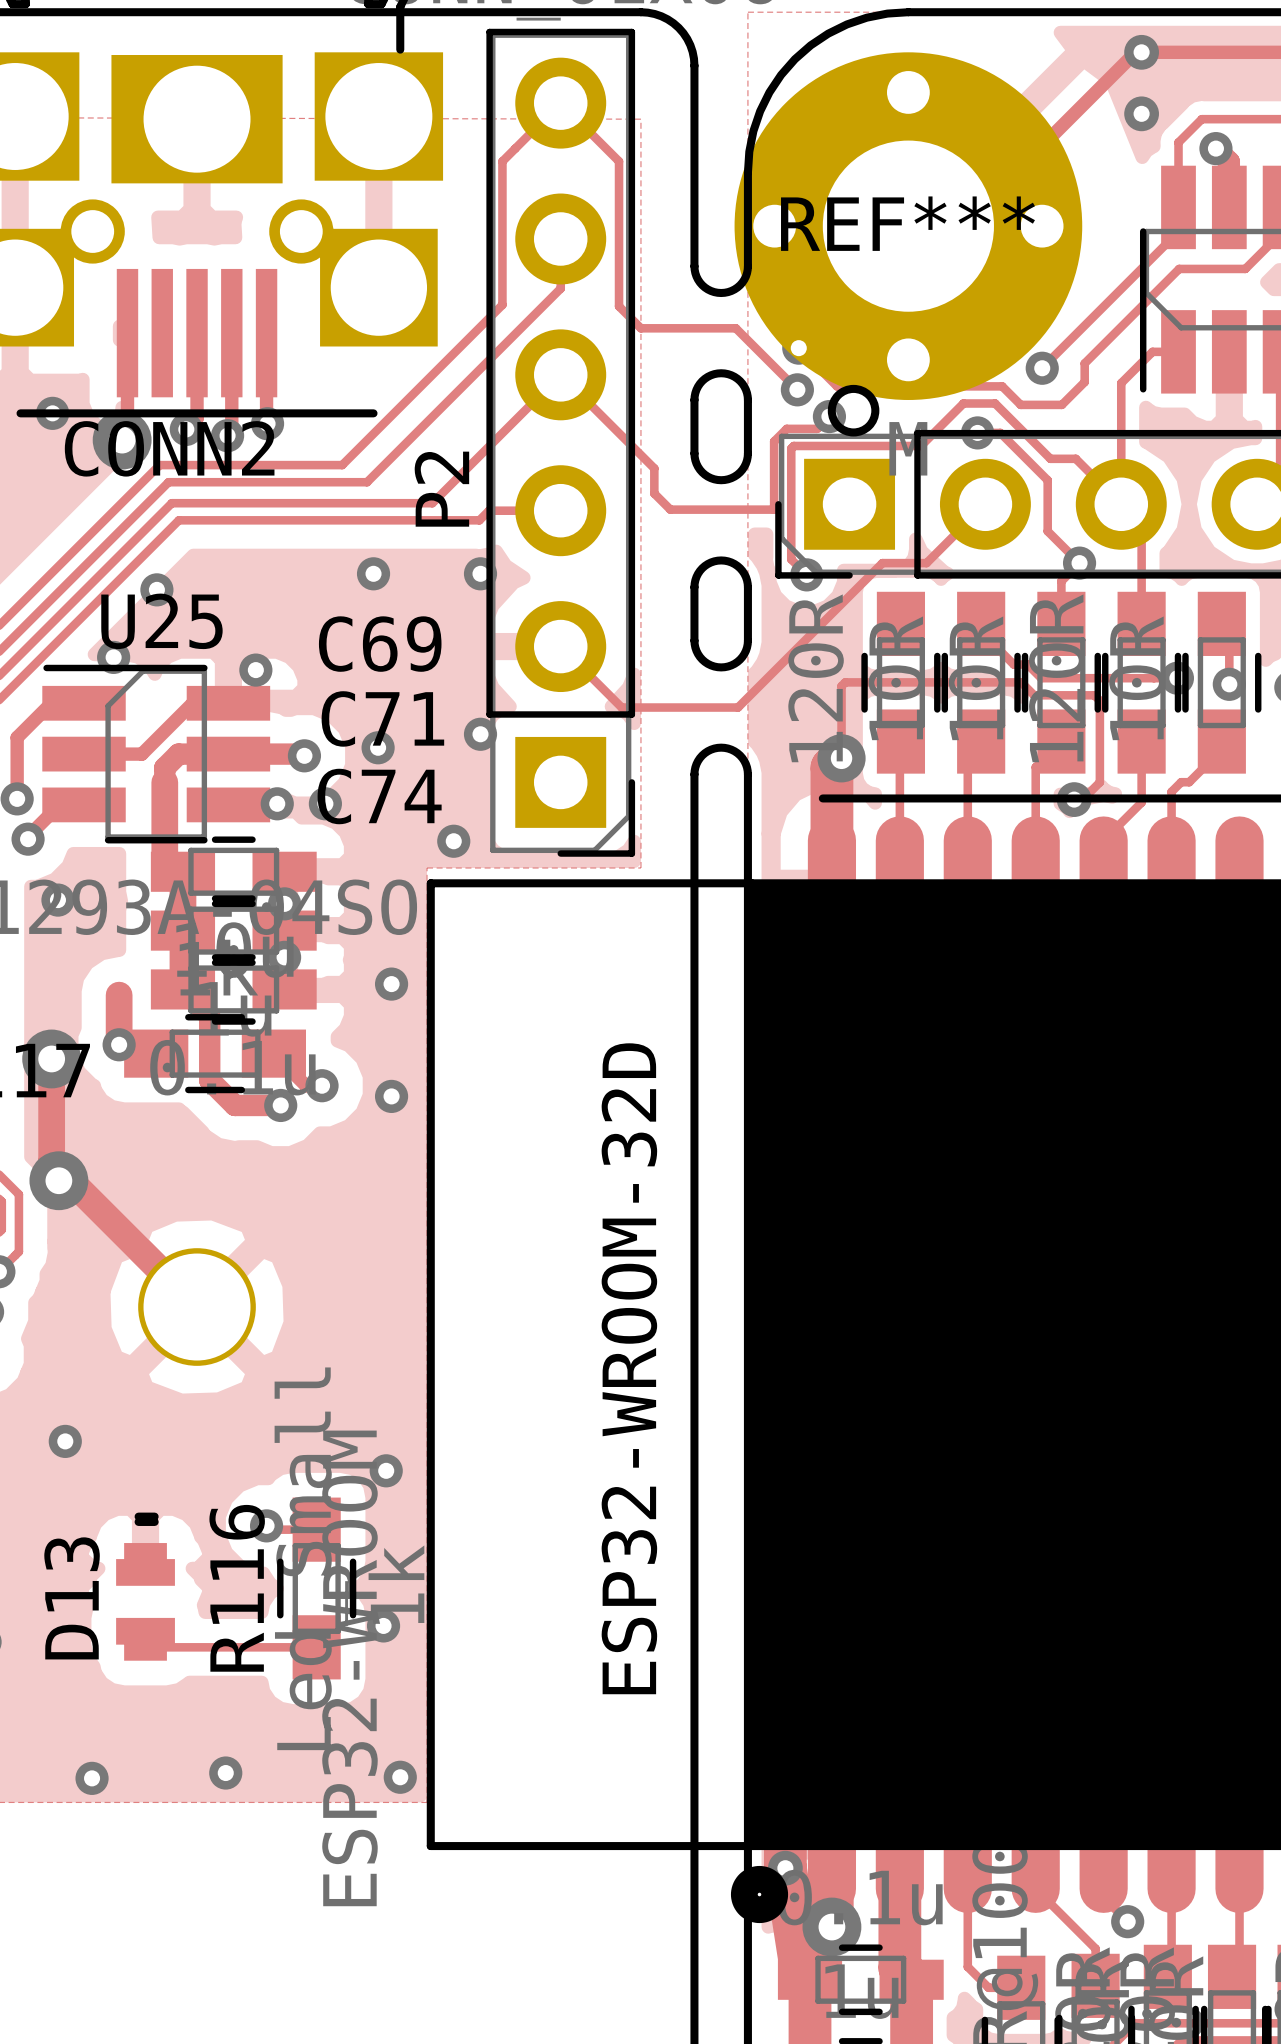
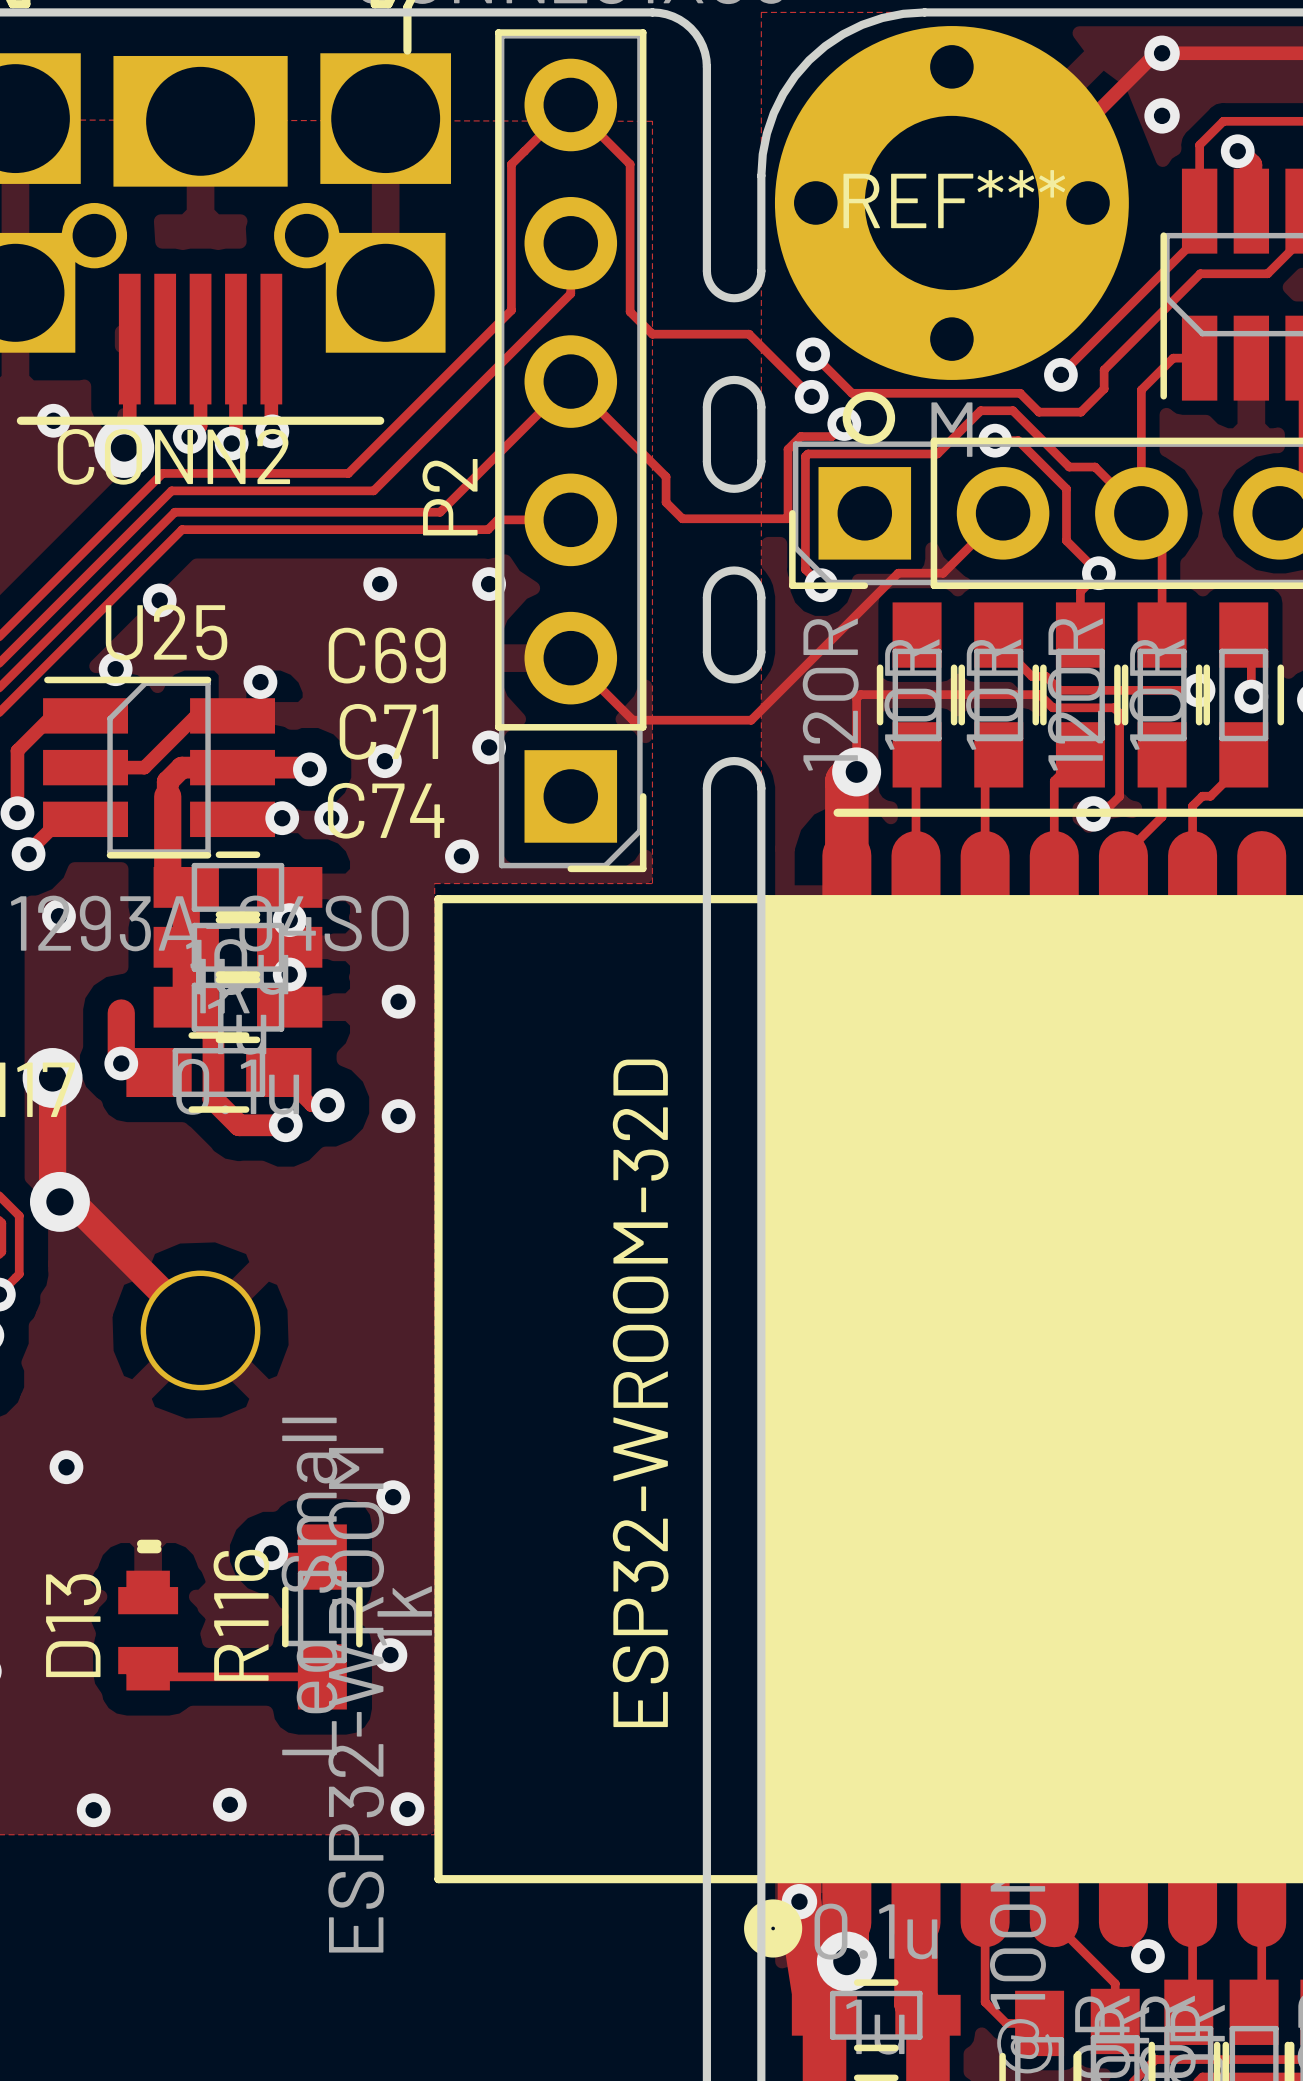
REF*** position: (908, 226) -> (951, 202)

